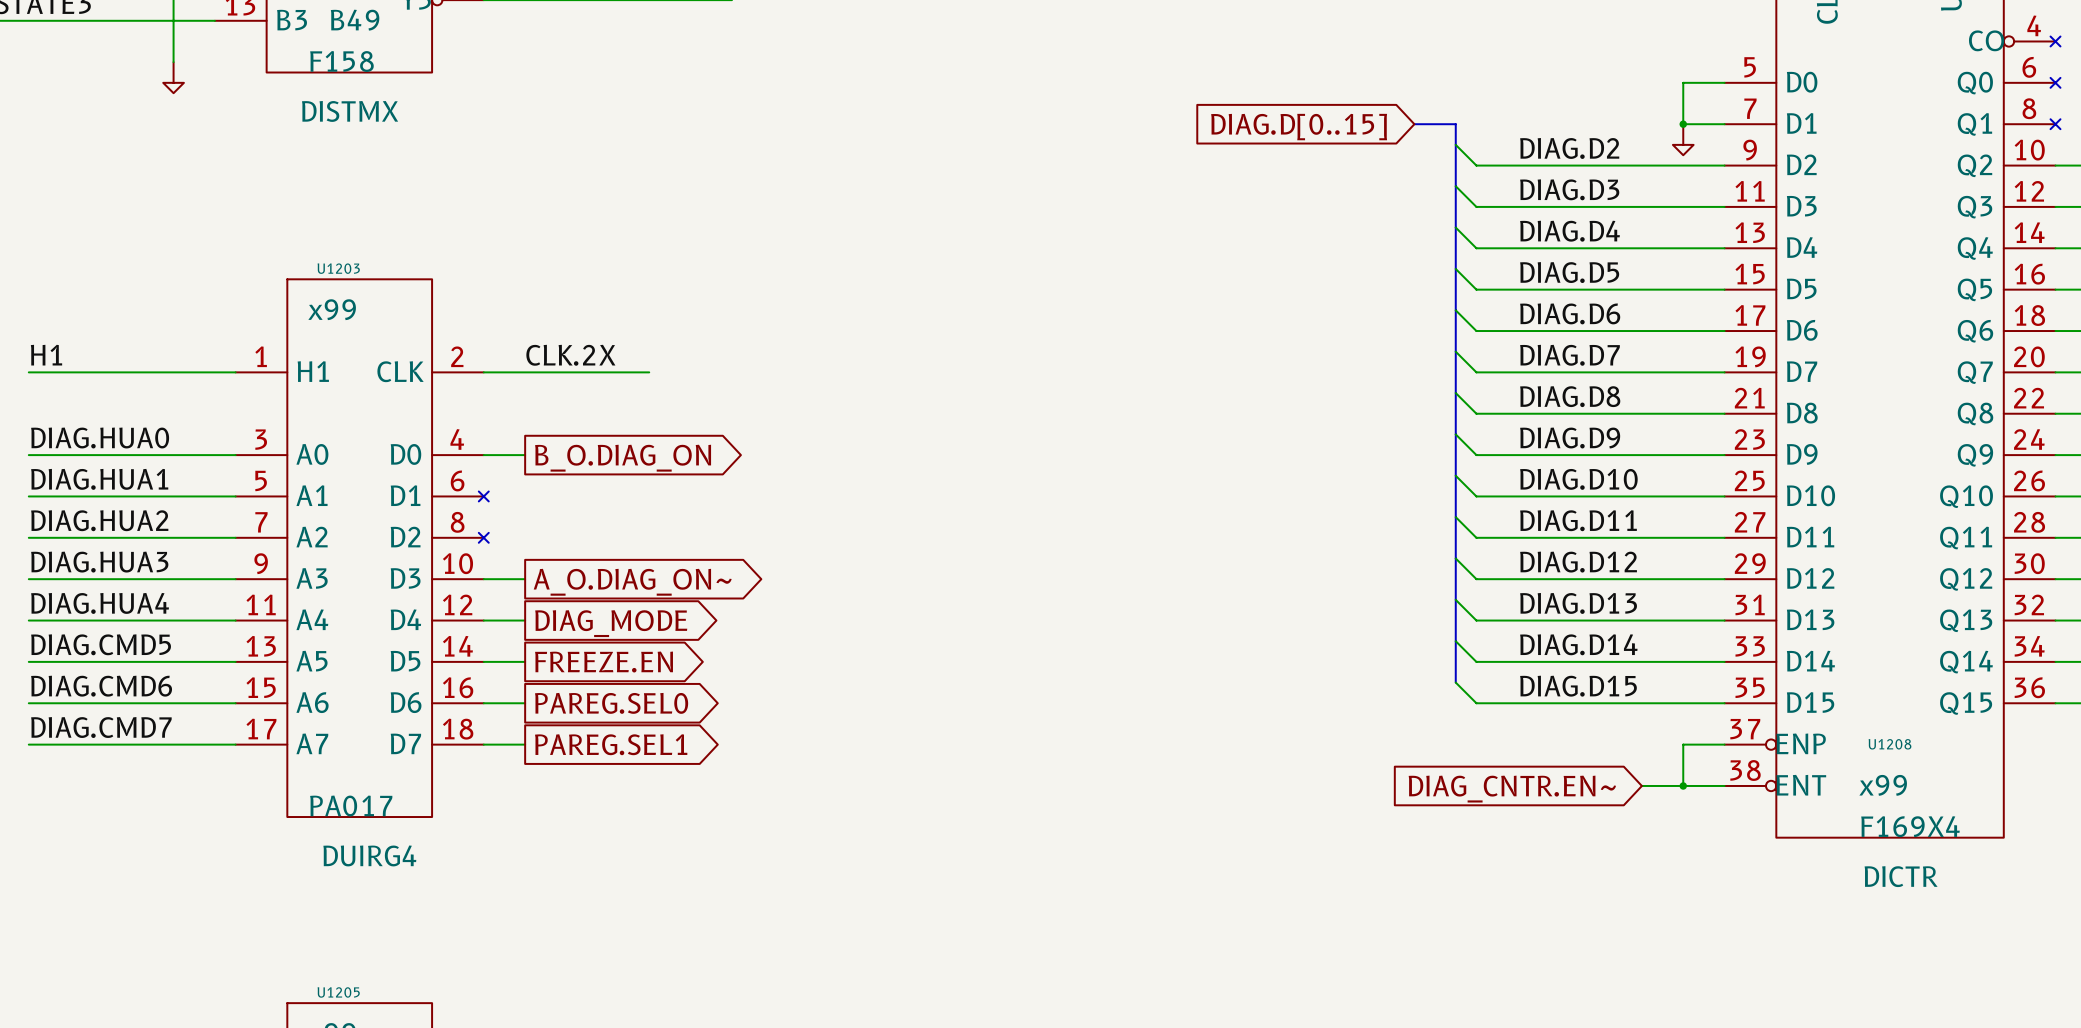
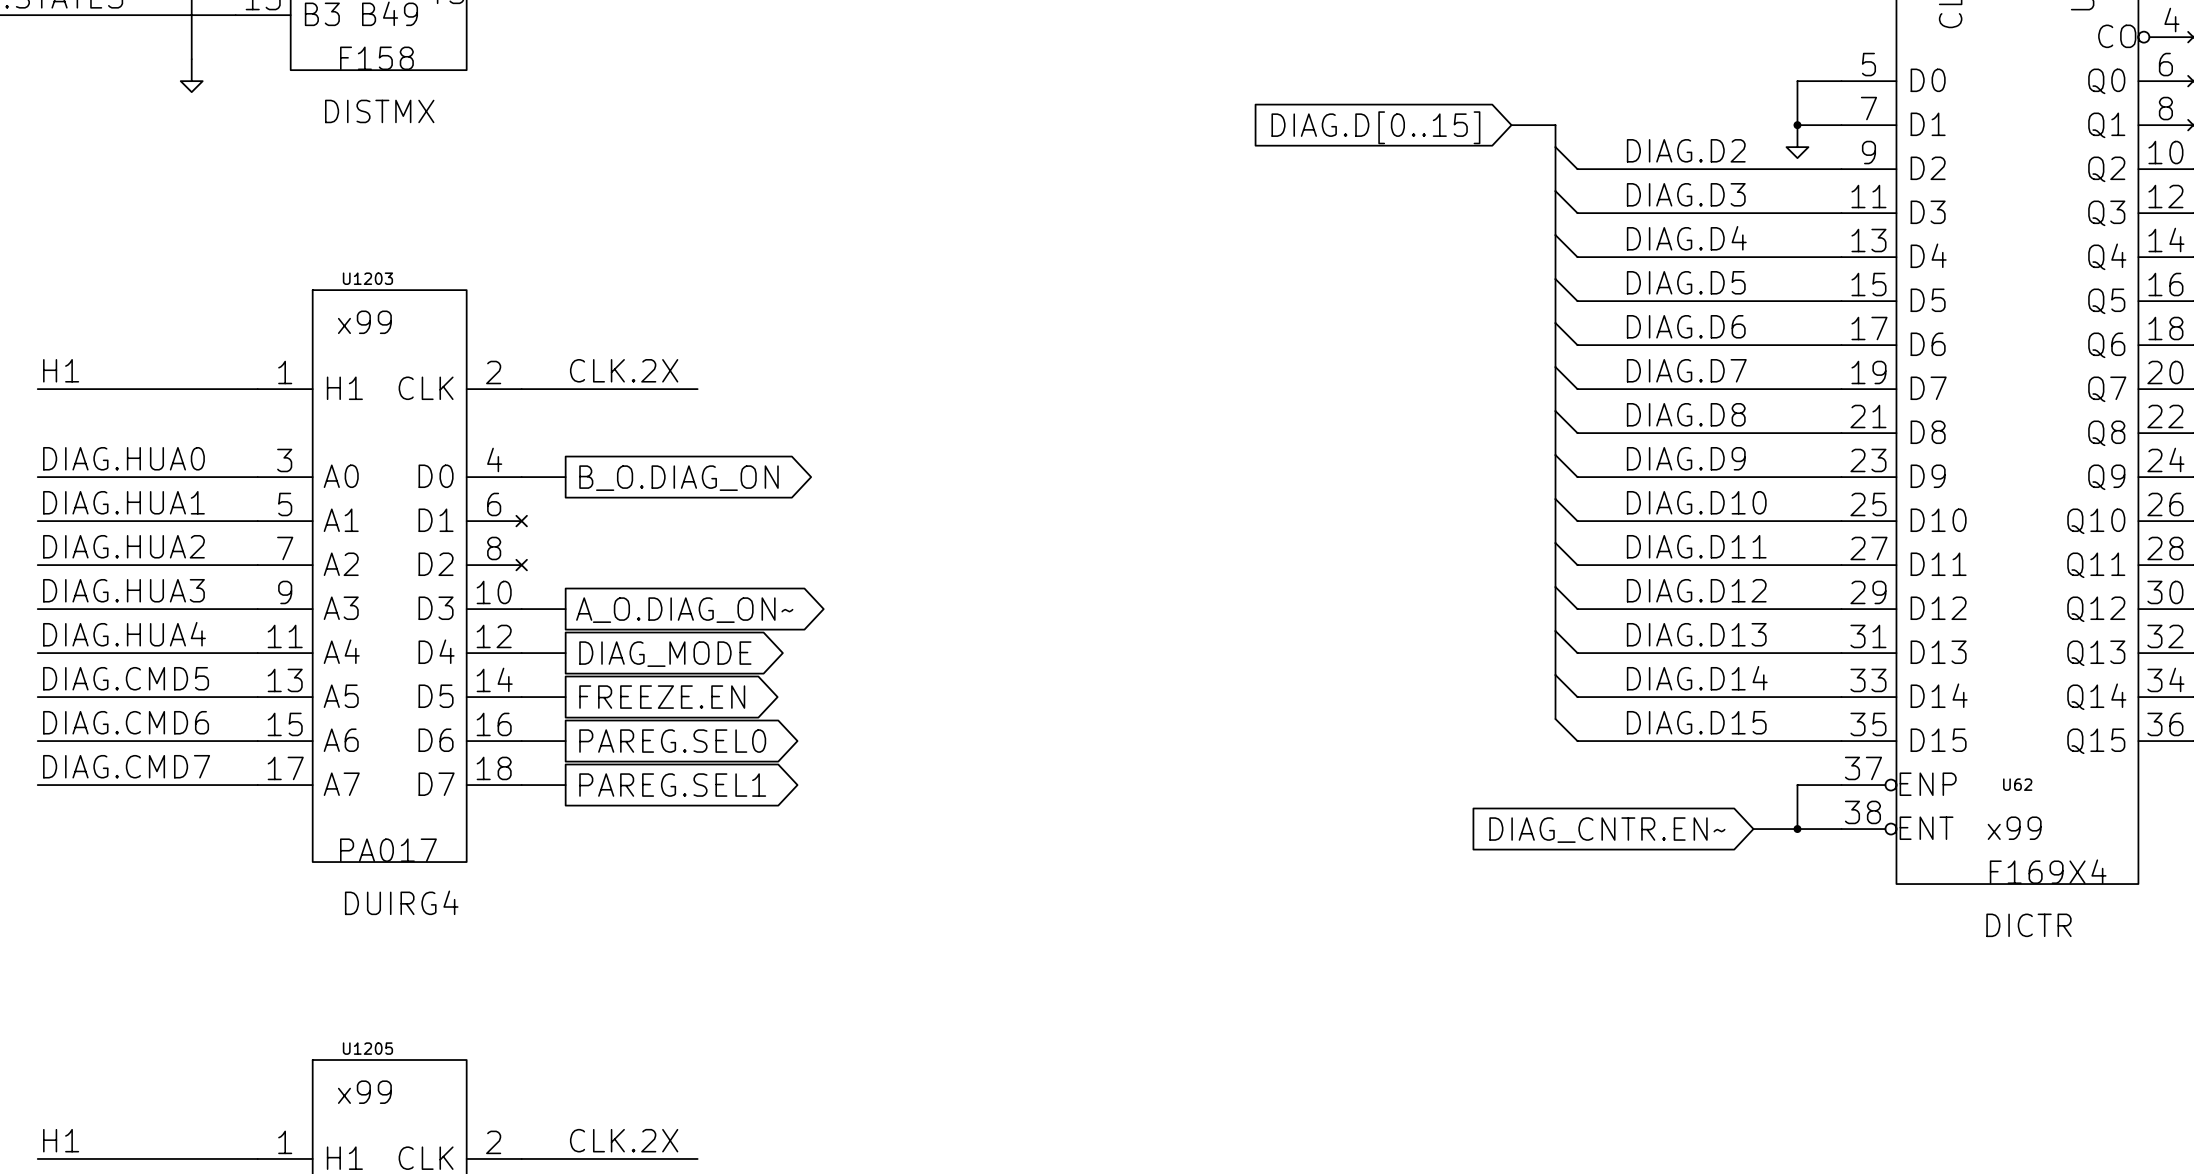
U1208 name: U1208 (1890, 744) -> U62 (2017, 784)

